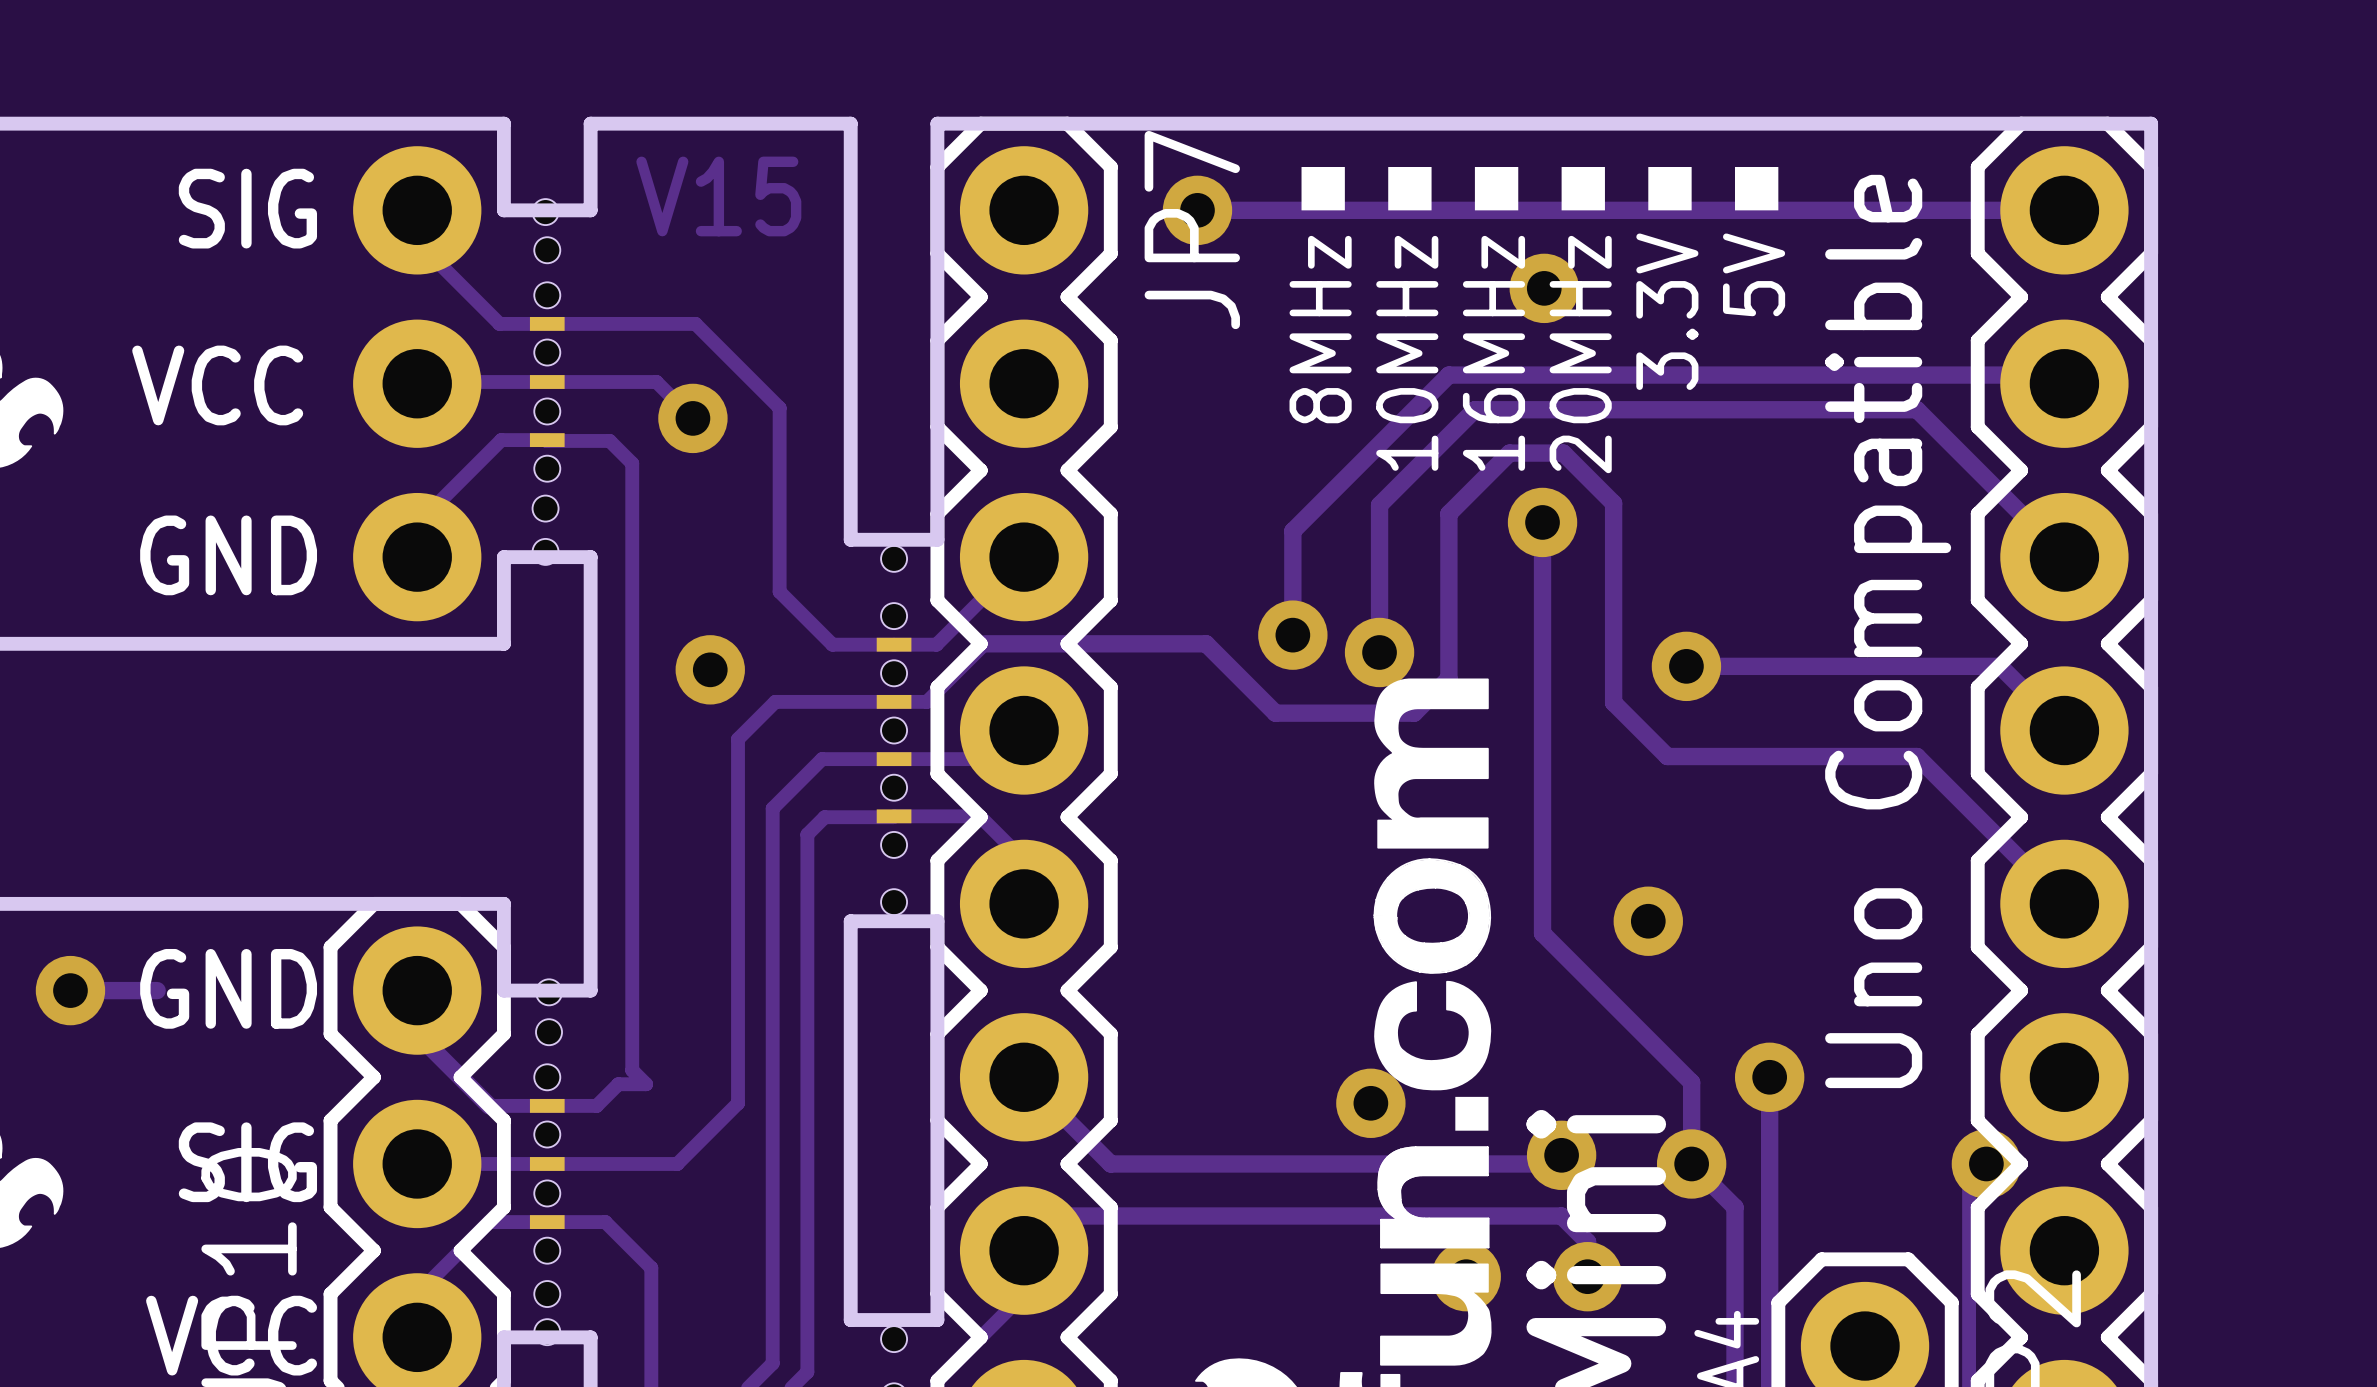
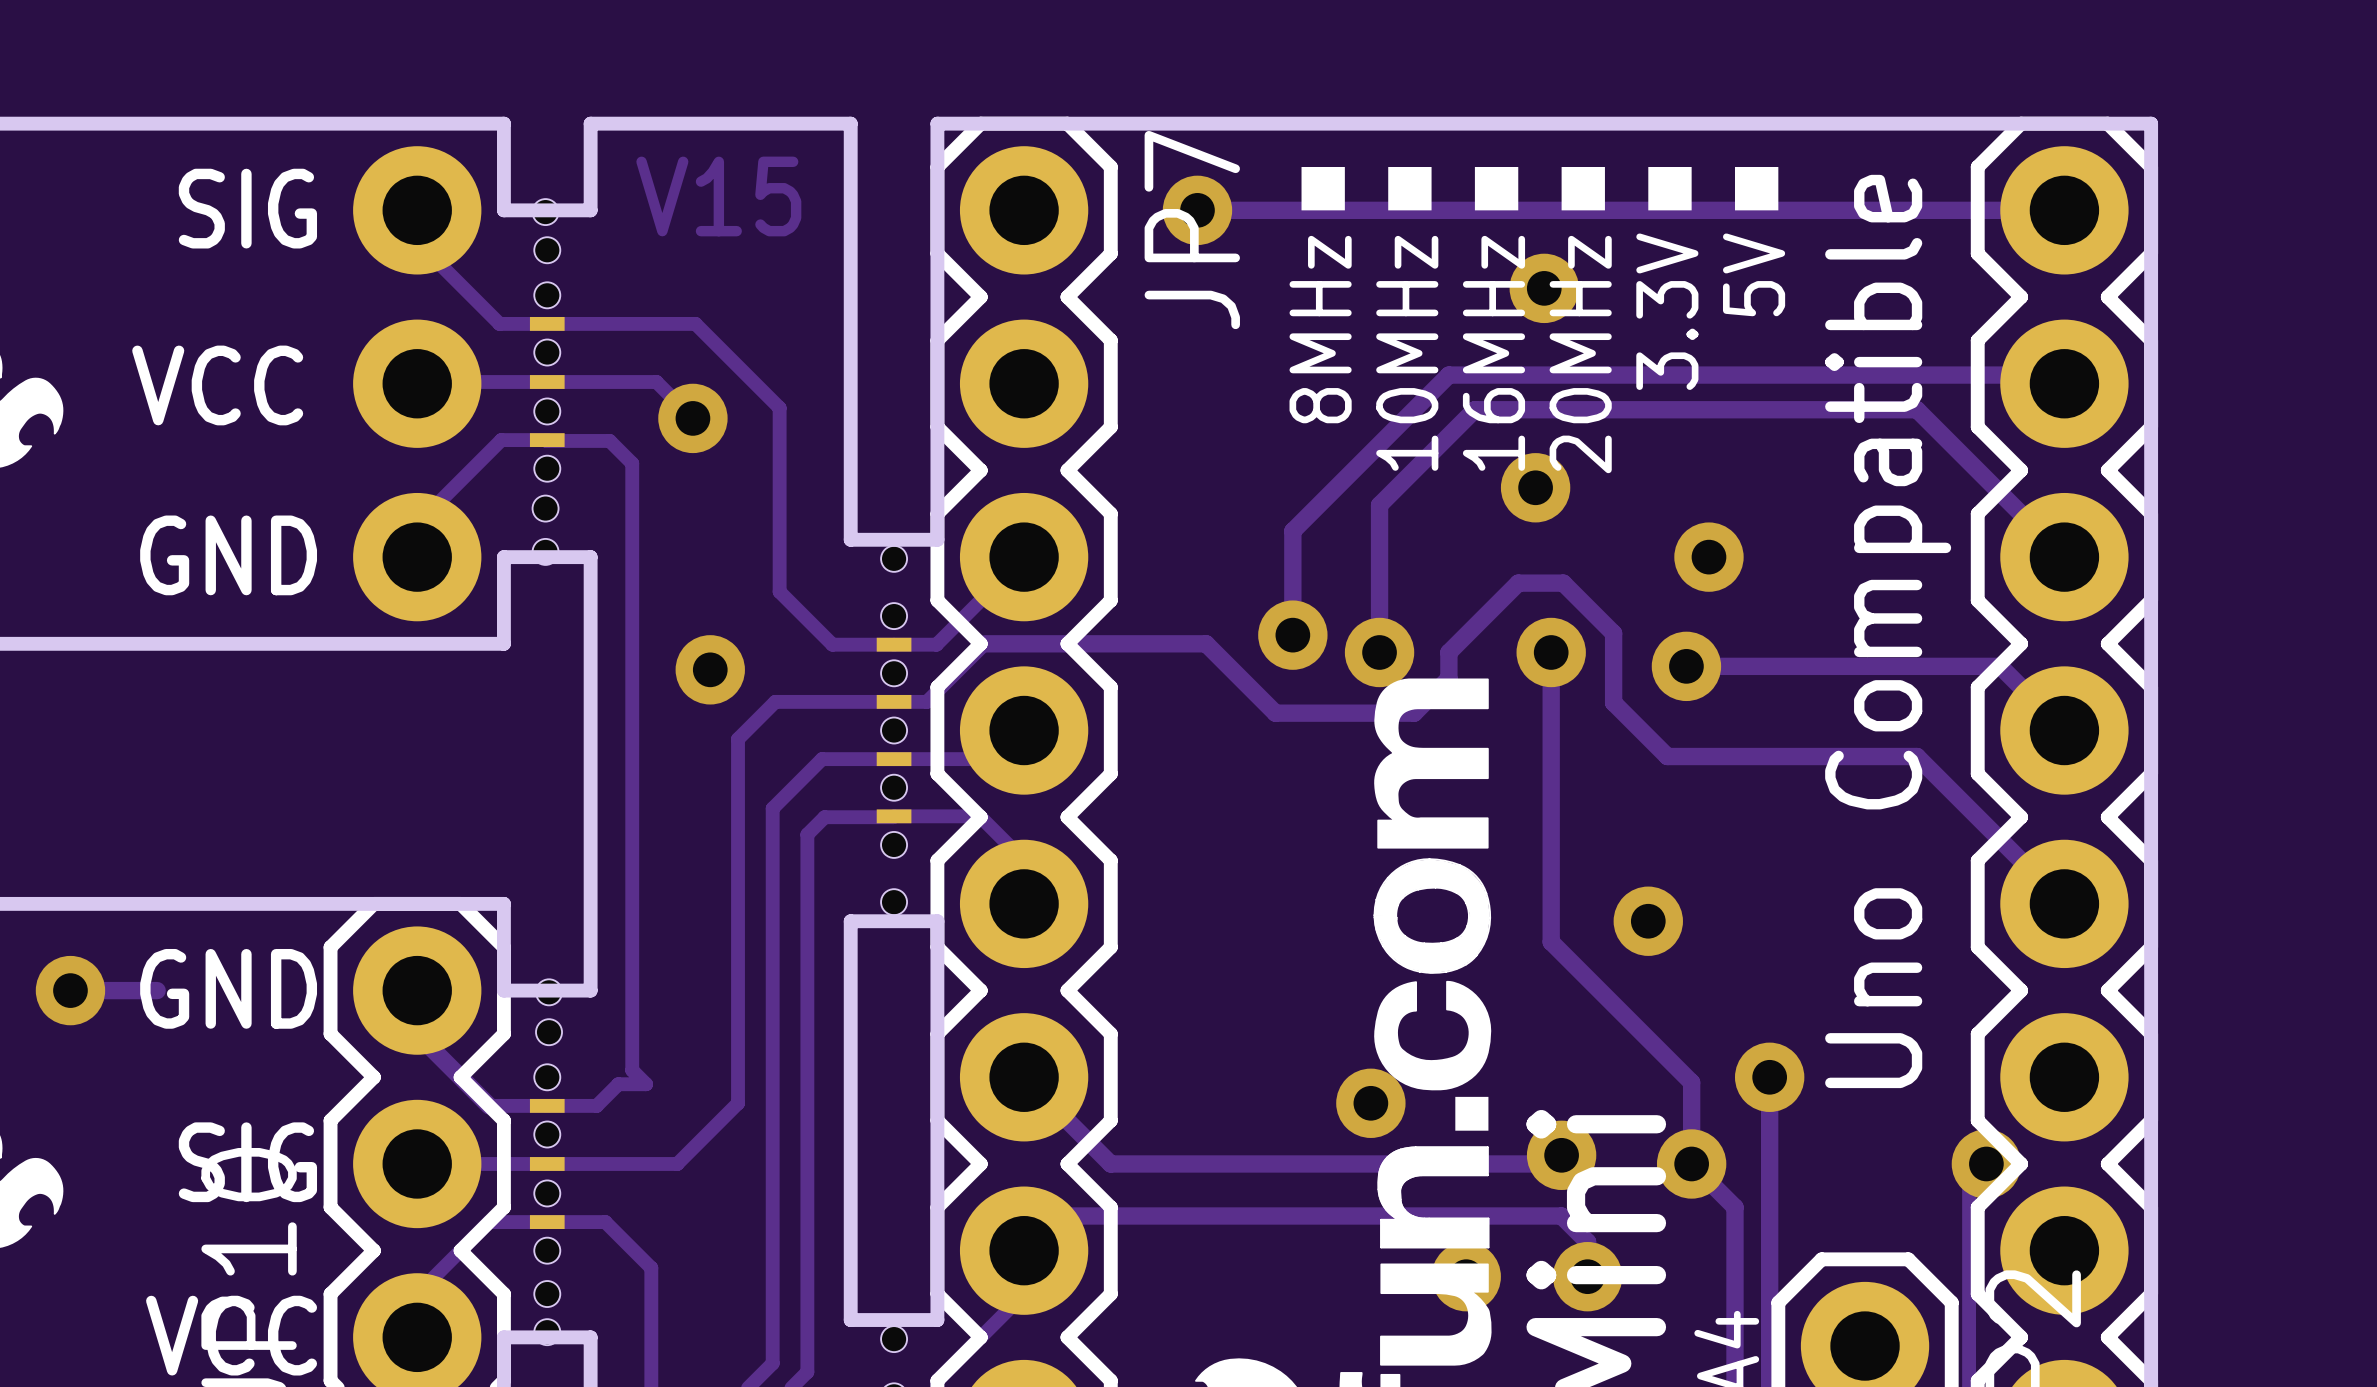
track: (1542, 522) (1542, 933) (1551, 942) -> (1551, 652) (1551, 942)
via position: (1542, 522) -> (1535, 487)
via: none -> (1708, 557)
track: (1613, 633) (1613, 503) (1563, 453) (1509, 453) (1448, 513) (1448, 652) -> (1613, 633) (1563, 583) (1518, 583) (1448, 652)
via: none -> (1551, 652)

